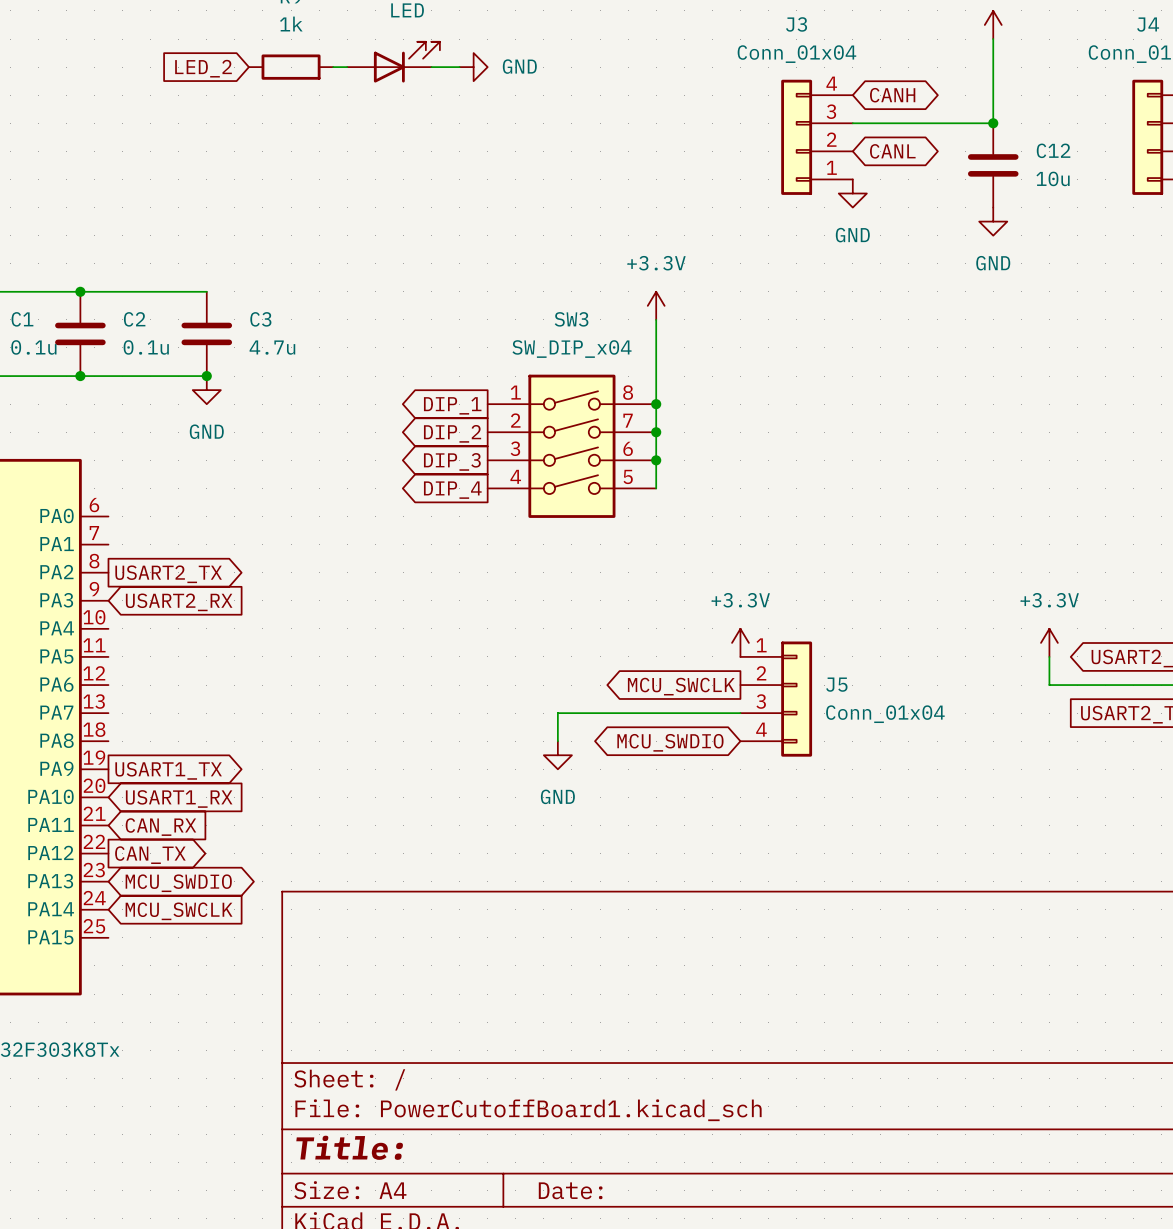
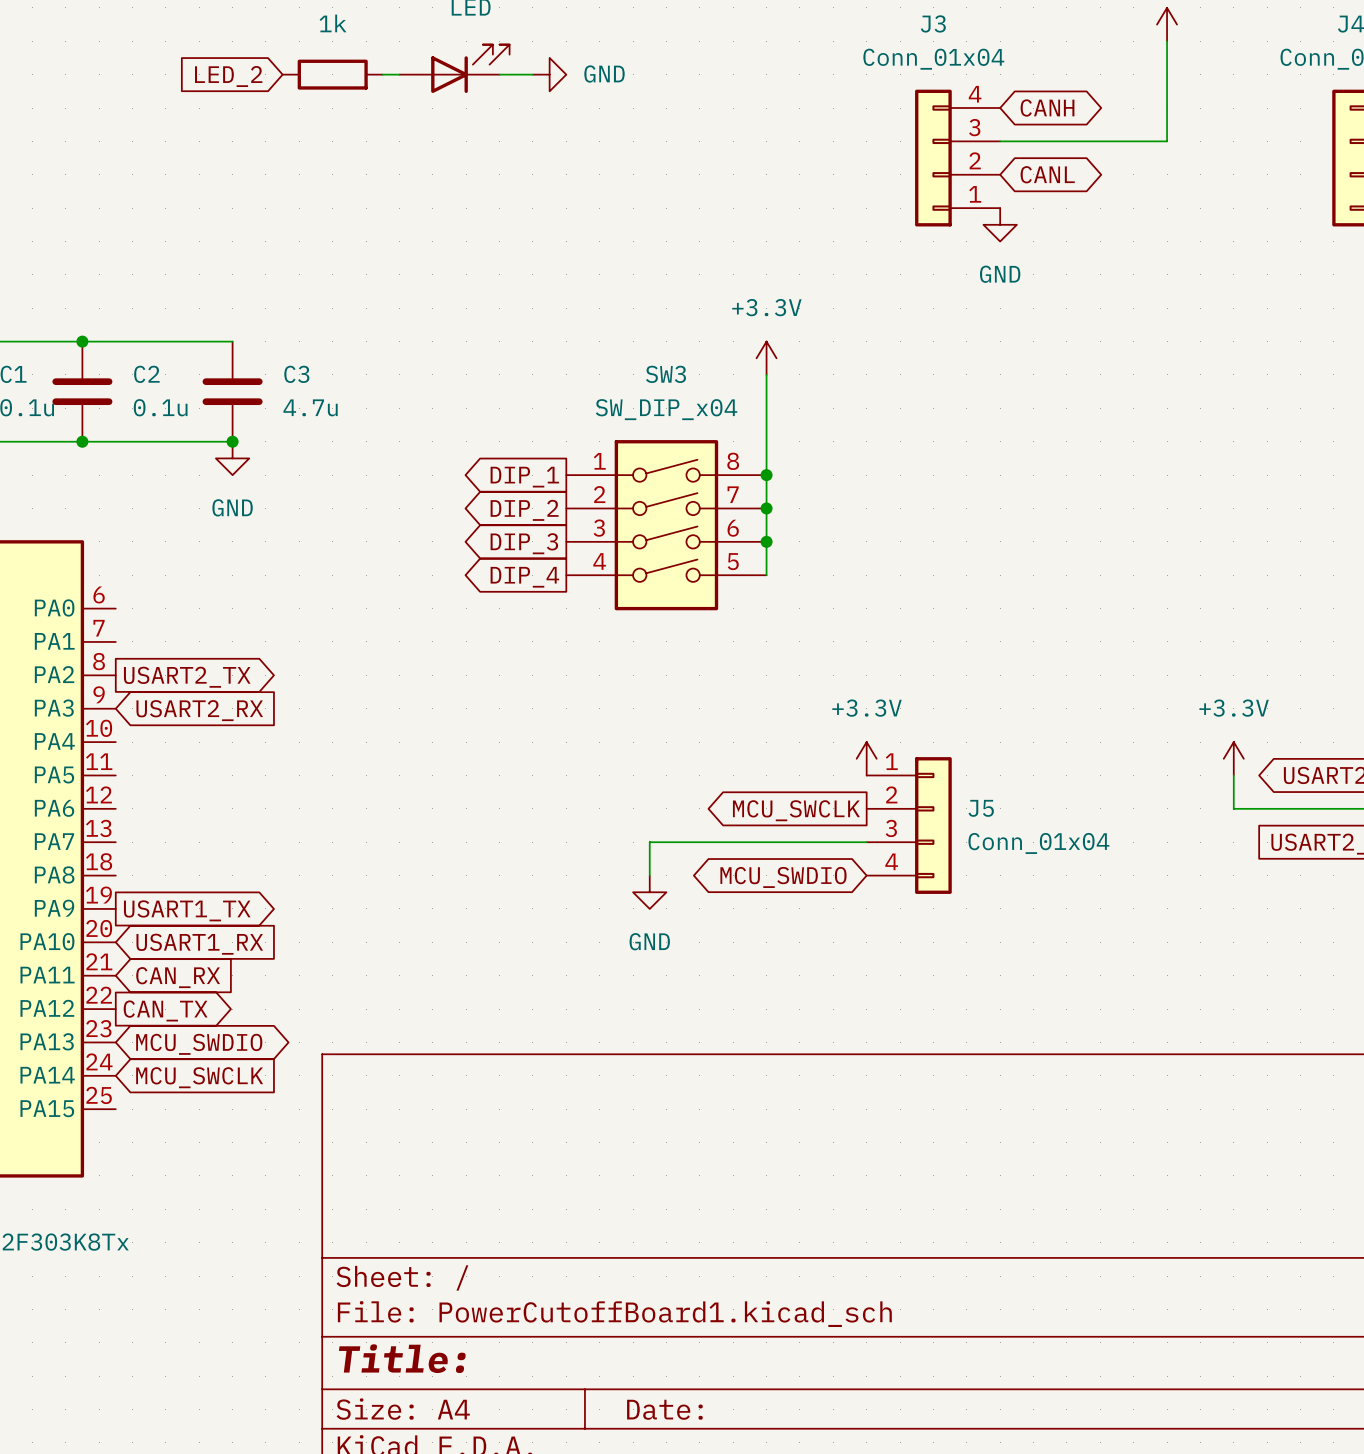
junction: (993, 123) -> none
C12: 10u (993, 165) -> none
power symbol: GND (993, 221) -> none

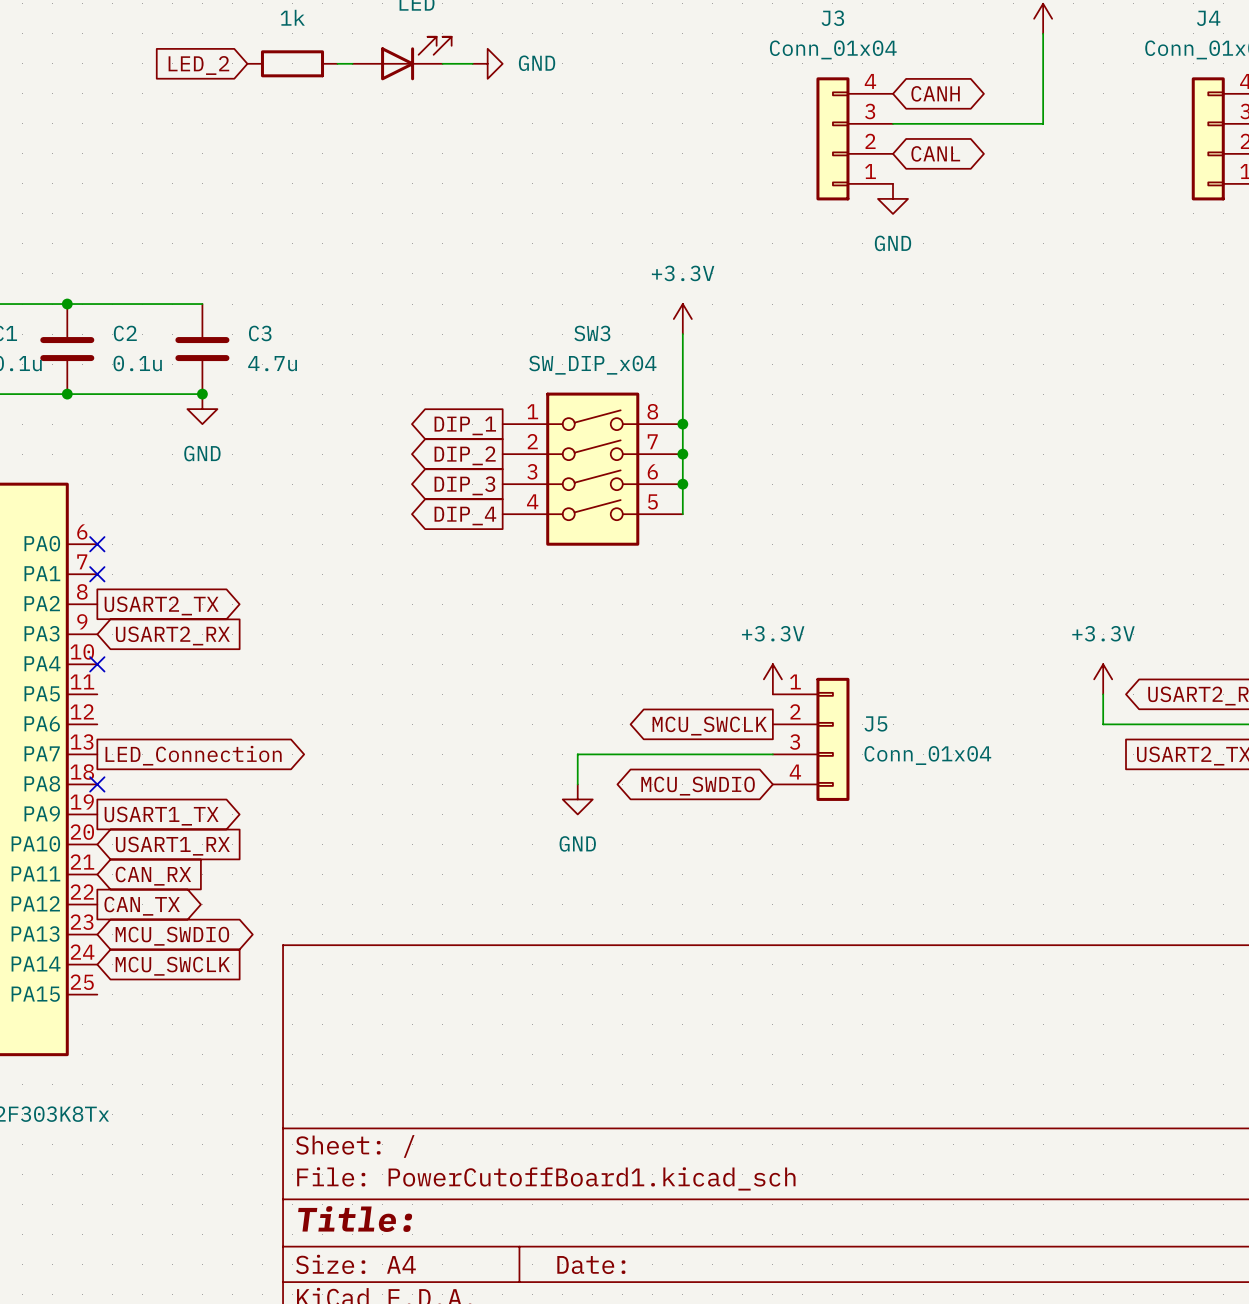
no-connect mark: none -> (97, 544)
no-connect mark: none -> (97, 574)
no-connect mark: none -> (97, 664)
global label: none -> LED_Connection (193, 755)
no-connect mark: none -> (97, 784)

